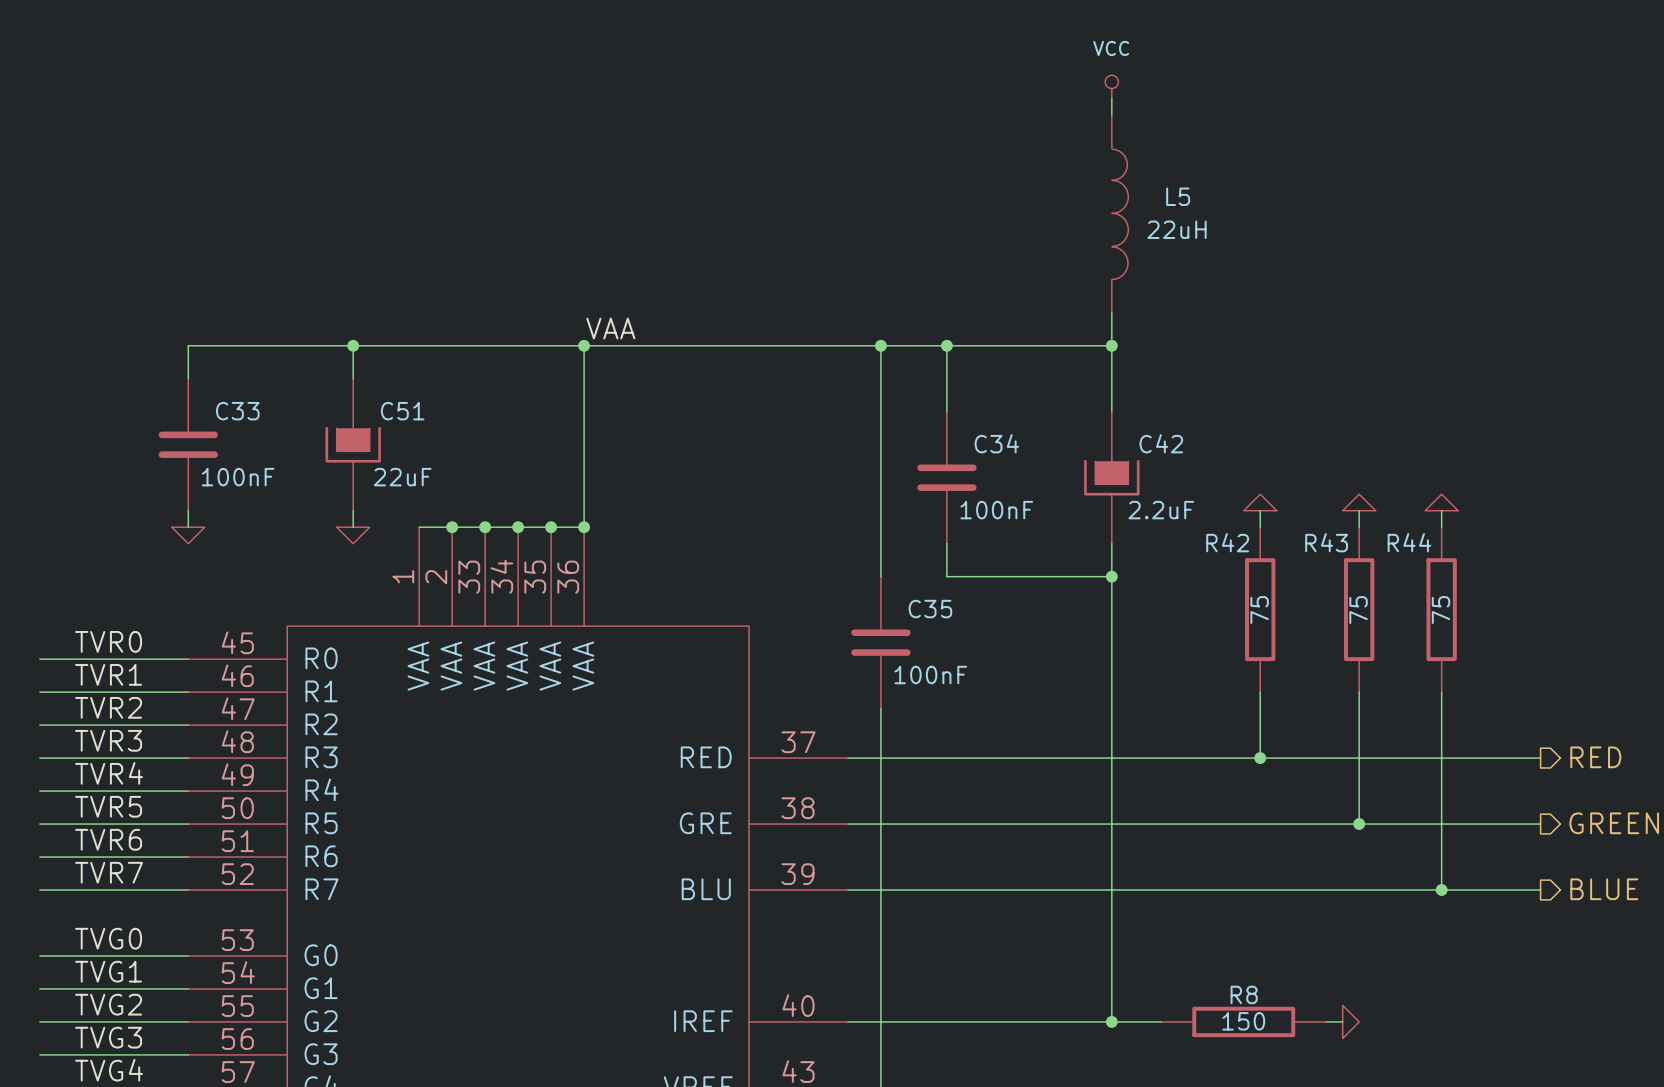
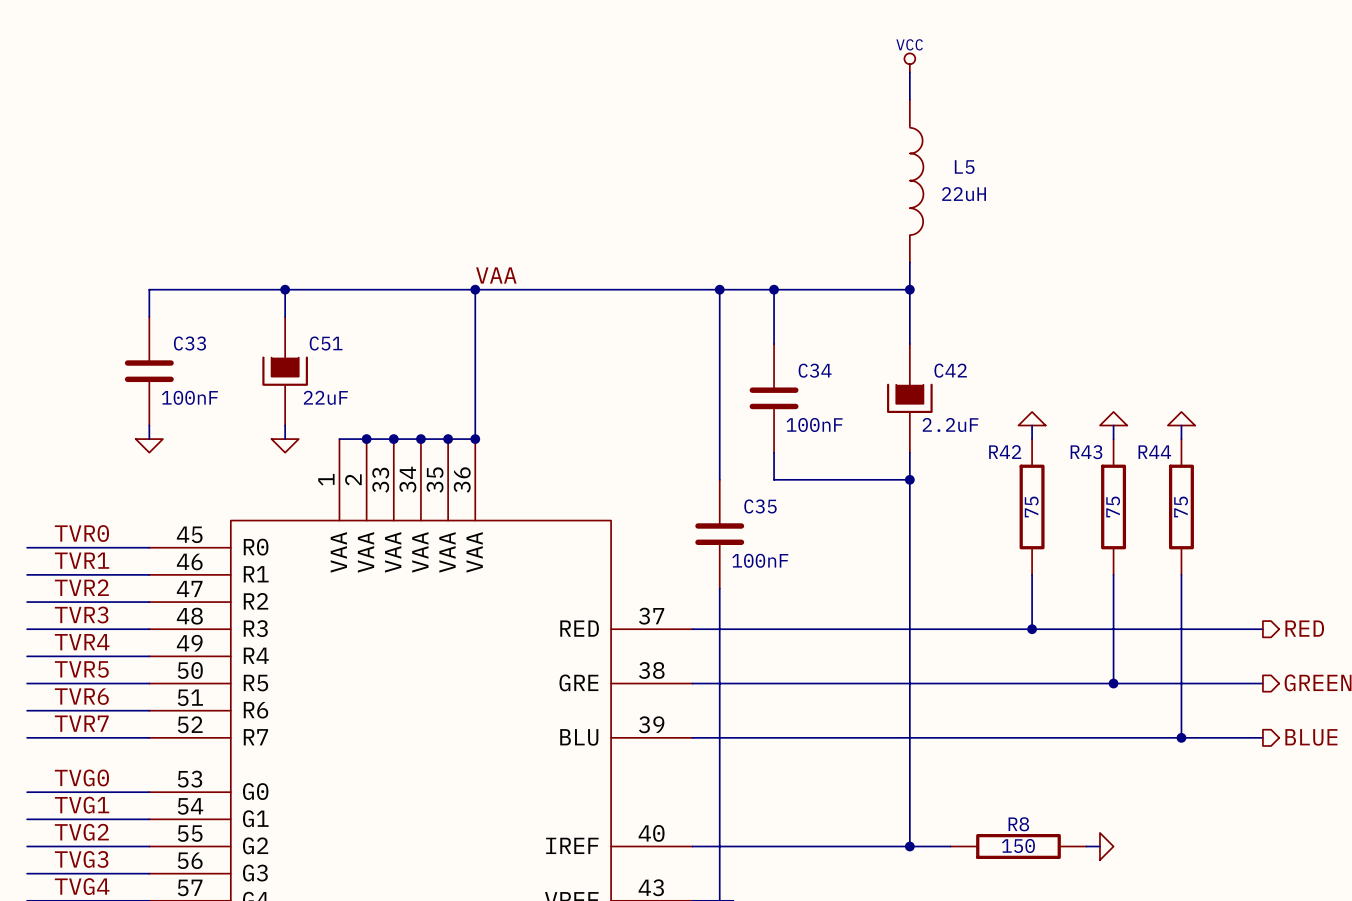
power symbol position: VCC (1111, 86) -> VCC (909, 62)

